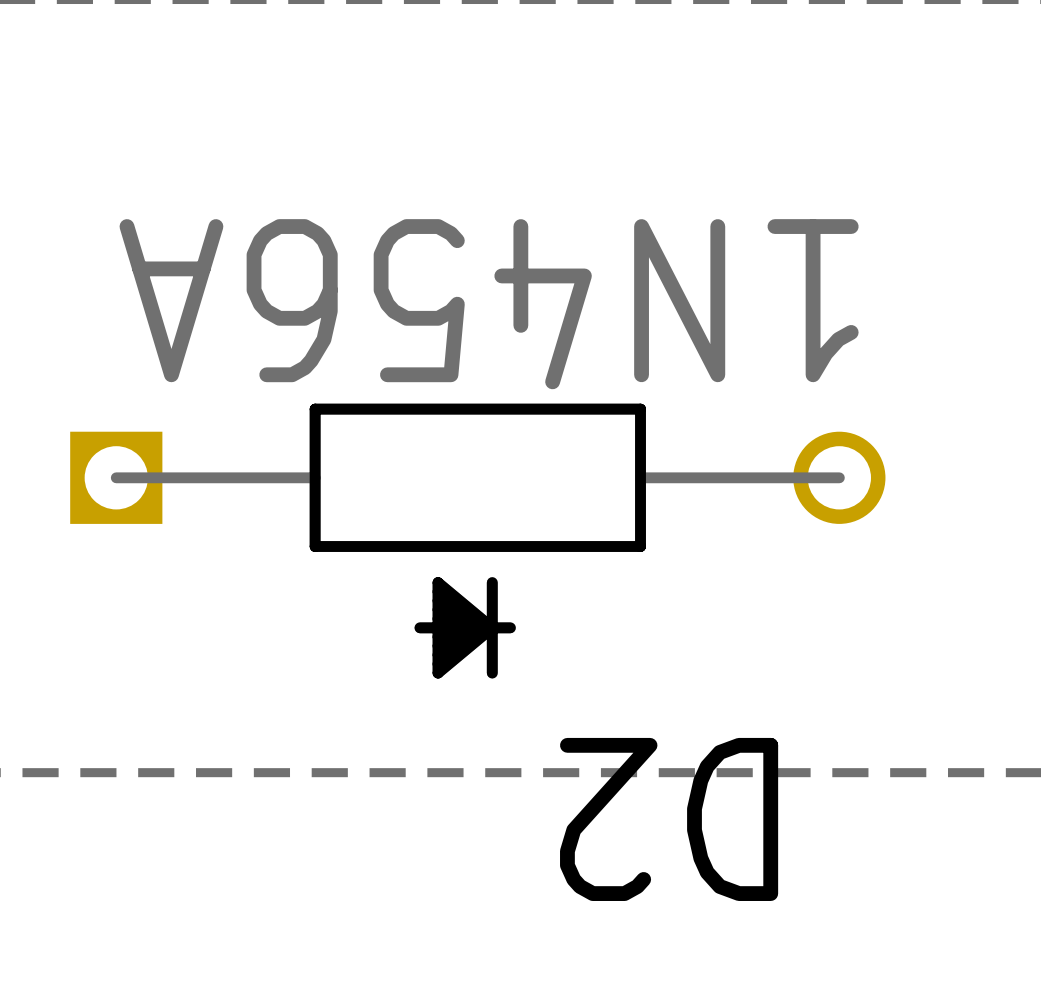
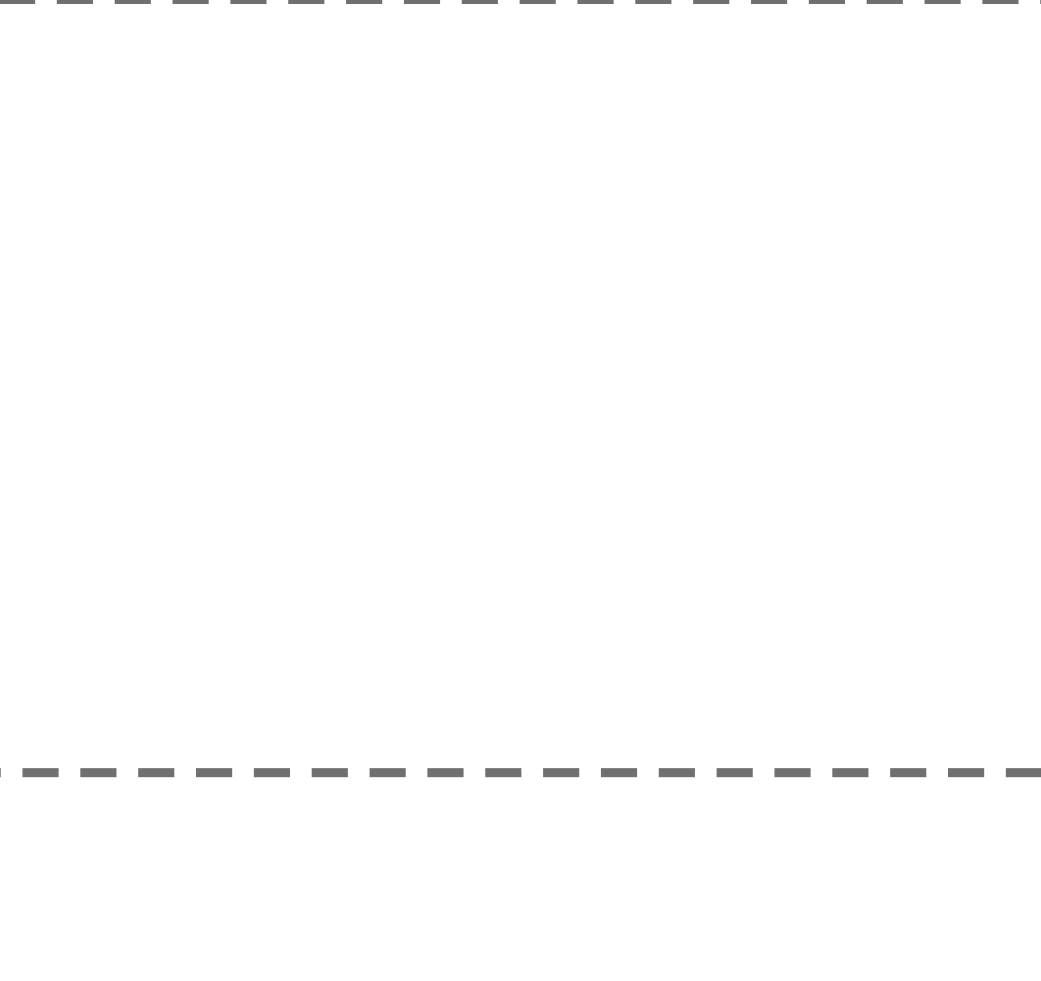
D2: 1N456A (477, 541) -> none

